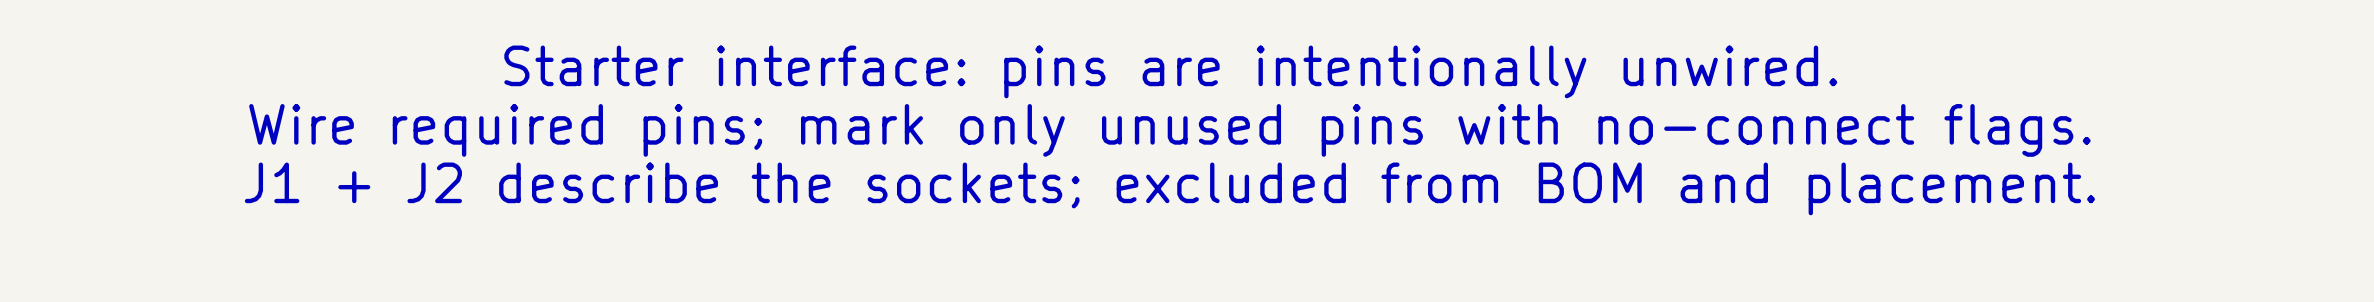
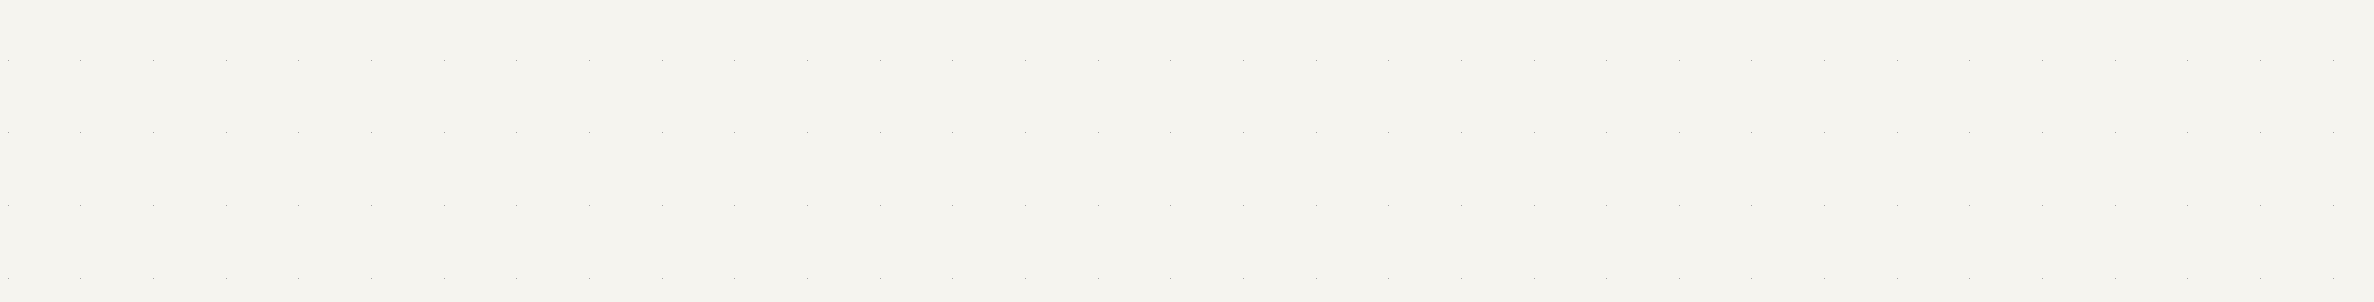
text: Starter interface: pins are intentionally unwired. (1170, 71) -> none
text: Wire required pins; mark only unused pins with no-connect flags. (1169, 130) -> none
text: J1 + J2 describe the sockets; excluded from BOM and placement. (1169, 188) -> none

